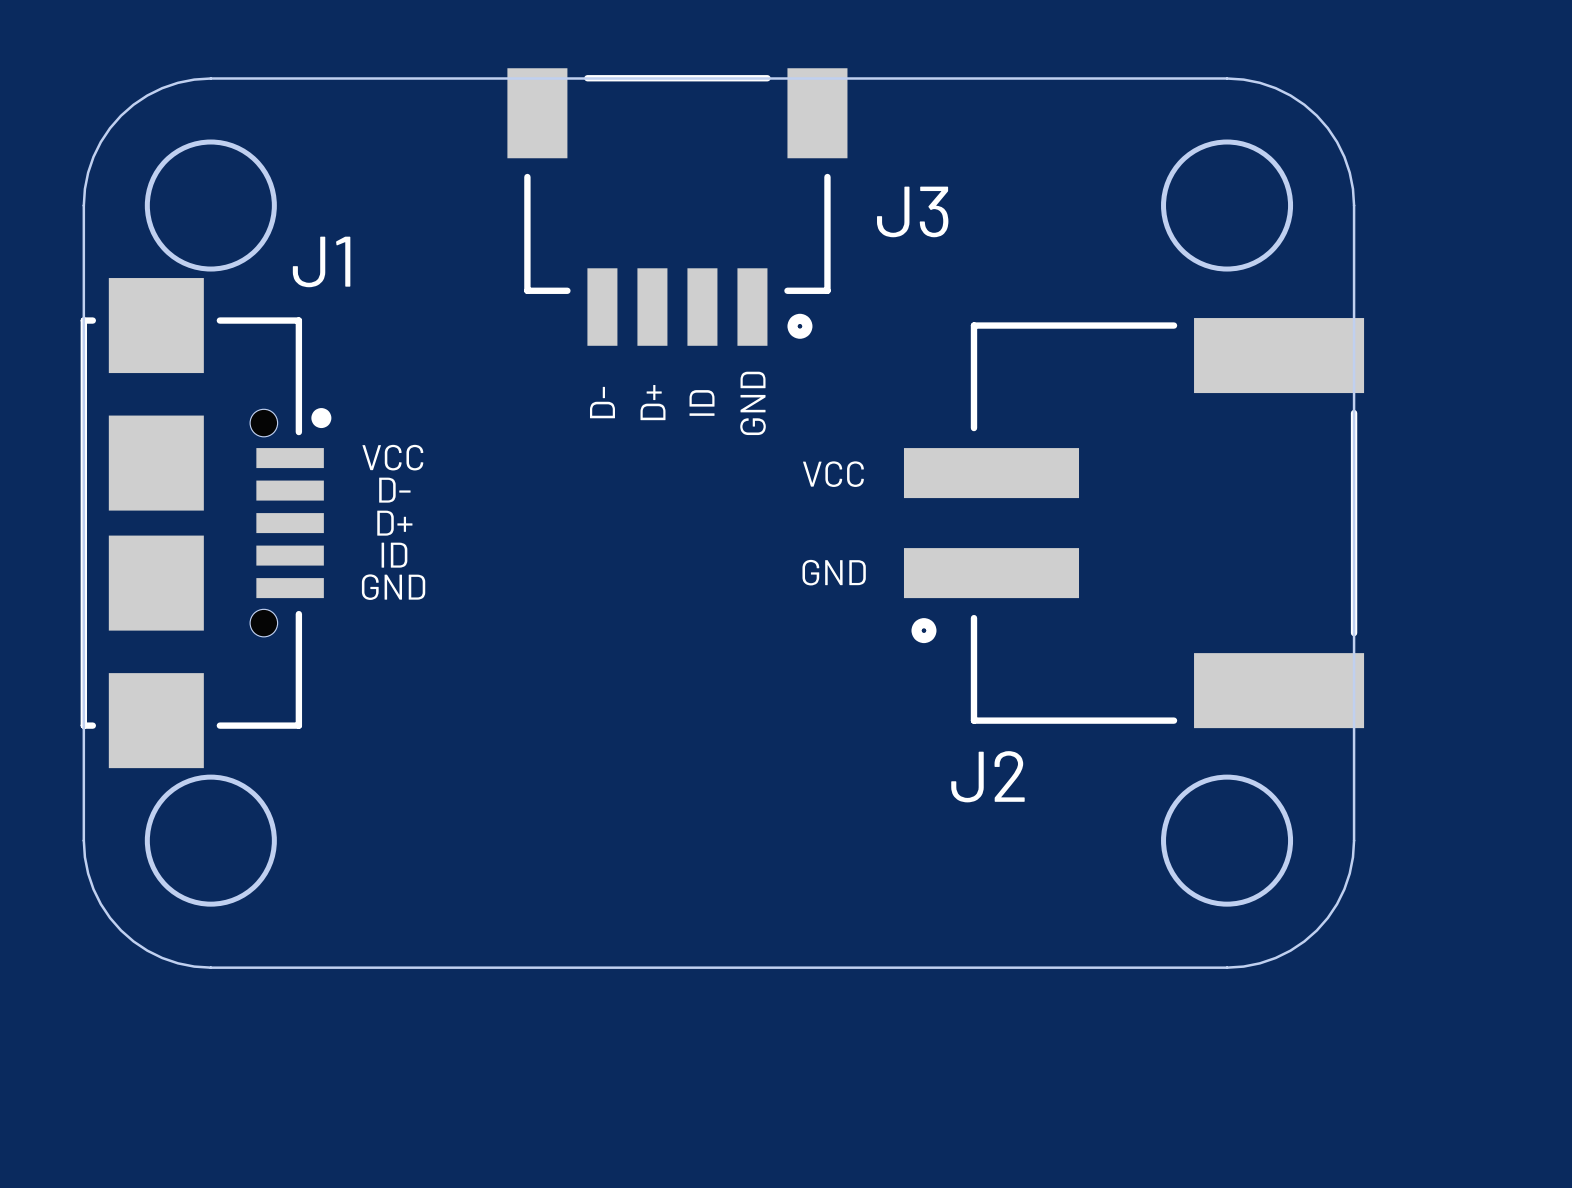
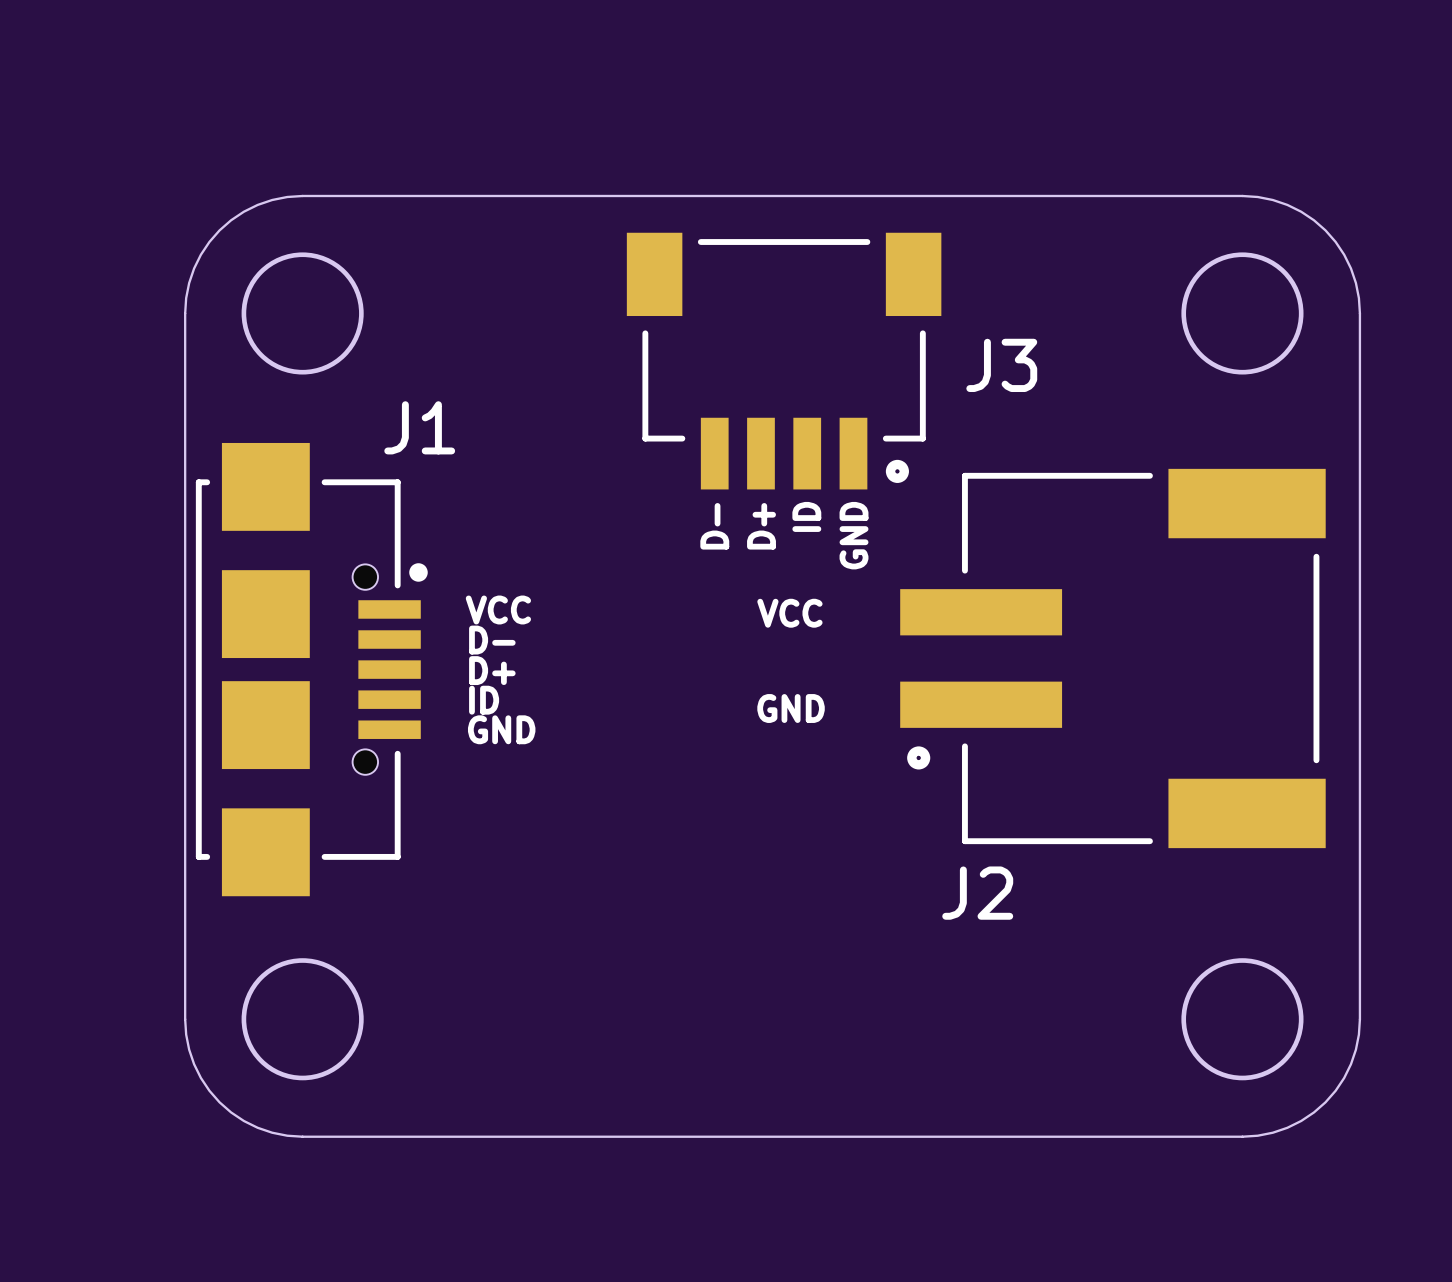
J3 position: (677, 207) -> (784, 361)
text: D- (602, 402) -> none
text: D+ (652, 402) -> D- (714, 526)
text: ID (702, 402) -> D+ (761, 526)
text: GND (753, 403) -> ID (806, 516)
text: none -> GND (854, 535)
text position: VCC (392, 457) -> VCC (498, 609)
text position: VCC (833, 474) -> VCC (789, 613)
text position: D- (394, 490) -> D- (492, 640)
J1 position: (206, 523) -> (311, 669)
text position: D+ (394, 523) -> D+ (492, 670)
J2 position: (1134, 523) -> (1112, 658)
text position: ID (394, 555) -> ID (484, 700)
text: GND (834, 572) -> none
text position: GND (393, 587) -> GND (501, 729)
text: none -> GND (791, 708)
board edge: (83, 840) (88, 873) (93, 889) (100, 904) (121, 930) (133, 941) (162, 957) (194, 966) (210, 967) (1243, 966) (1259, 963) (1290, 950) (1316, 930) (1337, 904) (1344, 889) (1349, 873) (1354, 840) -> (185, 900) (186, 1034) (194, 1064) (200, 1077) (219, 1102) (243, 1120) (272, 1132) (302, 1136) (1242, 1136) (1272, 1132) (1301, 1120) (1325, 1102) (1335, 1090) (1350, 1064) (1355, 1049) (1359, 1019) (1359, 900)
round board edge position: (210, 840) -> (302, 1019)
round board edge position: (1227, 840) -> (1242, 1019)

